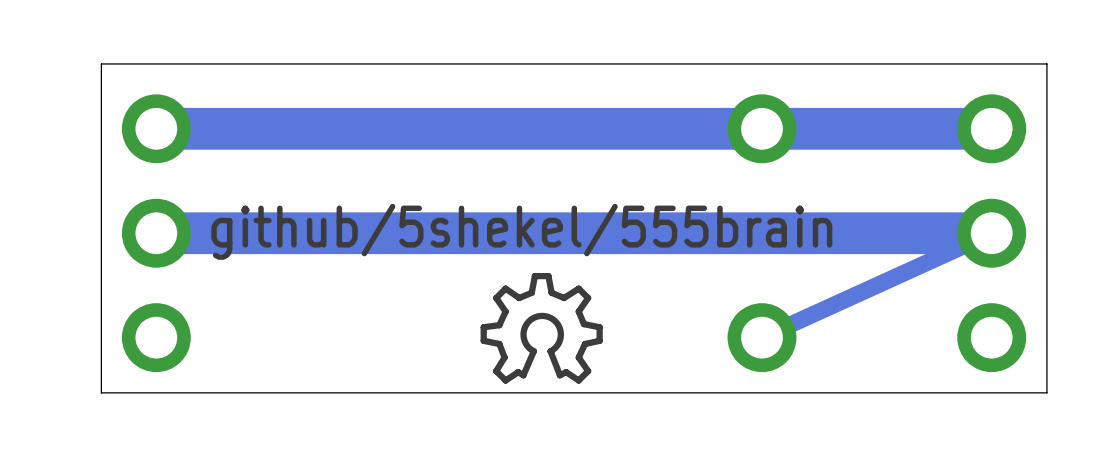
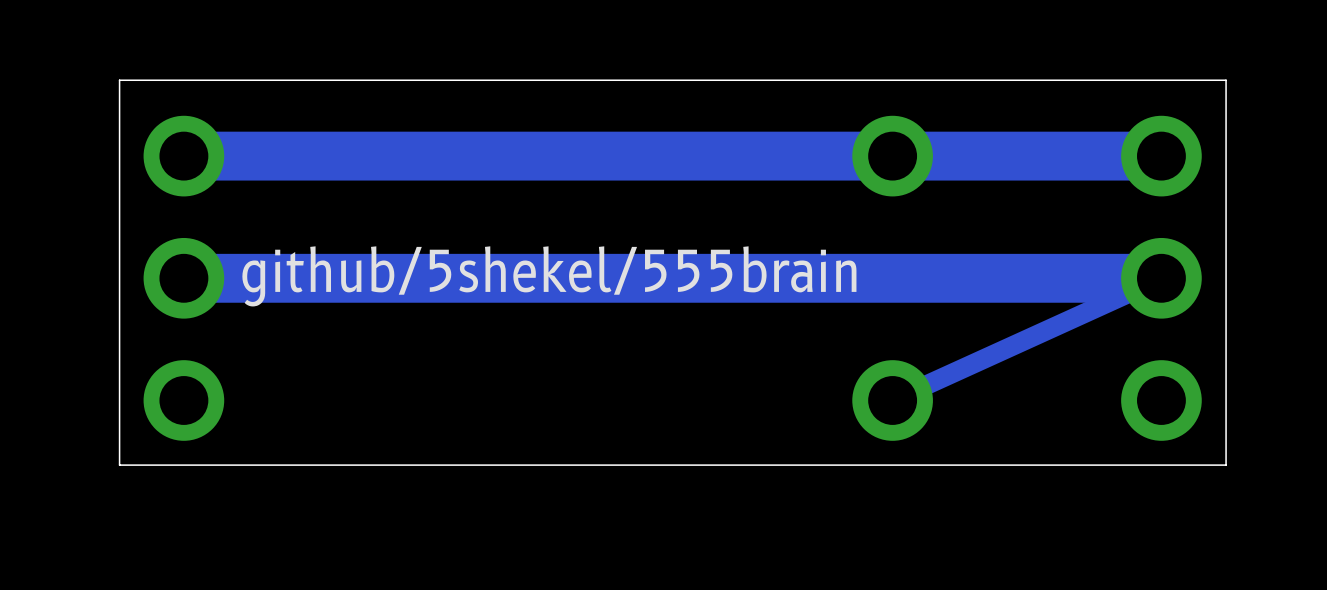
drawing: [480, 272, 603, 384] -> none

